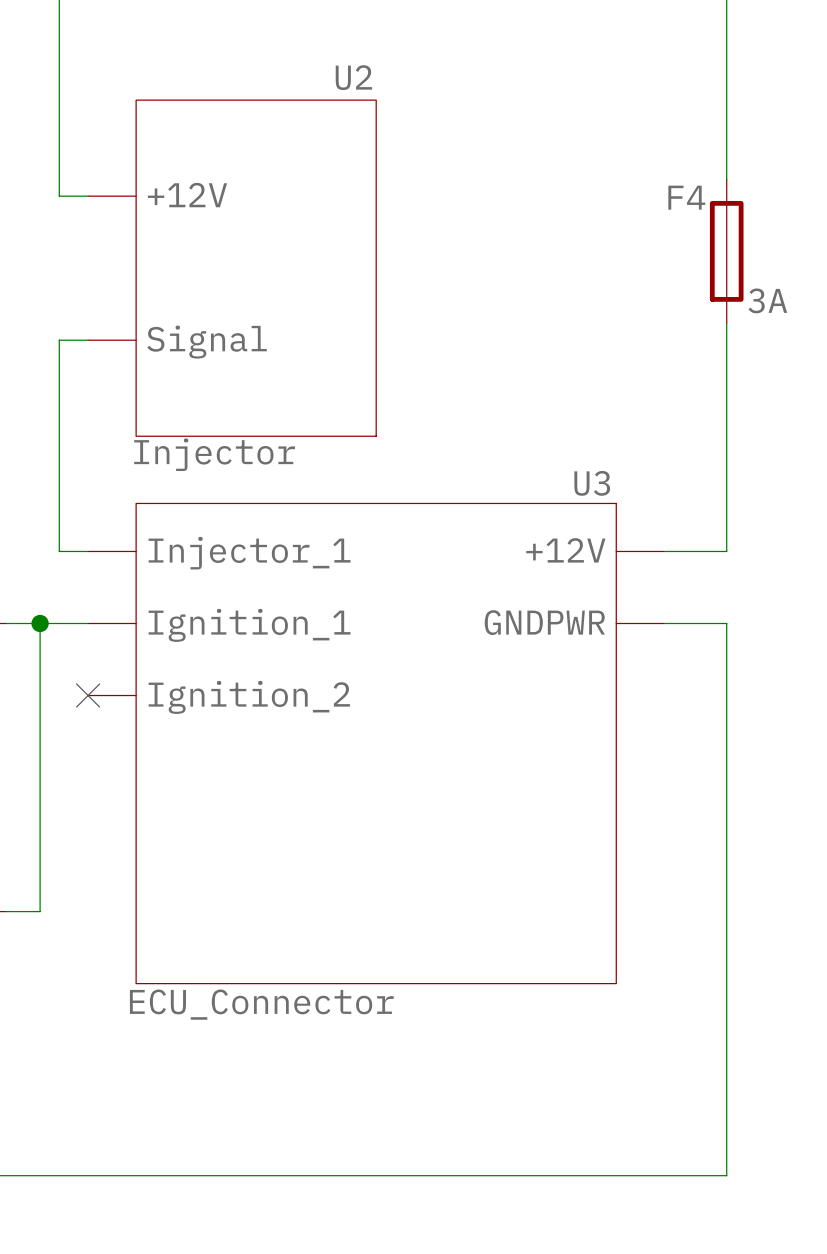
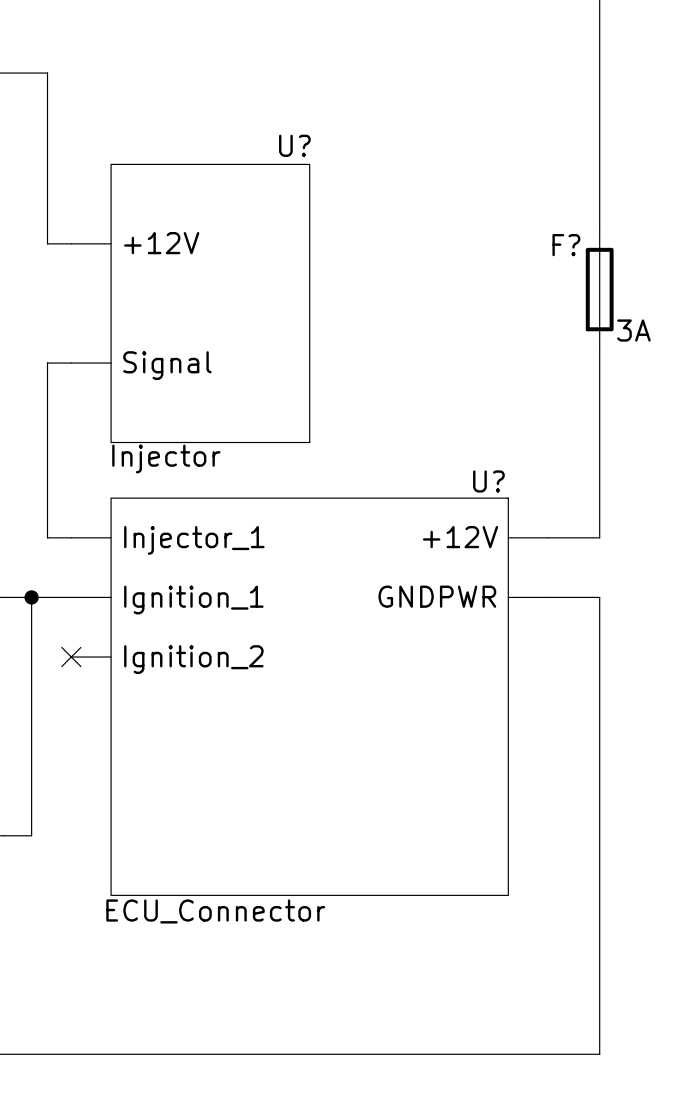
U2 name: U2 (353, 77) -> U? (294, 145)
F4 name: F4 (686, 197) -> F? (566, 245)
U3 name: U3 (592, 483) -> U? (488, 481)

